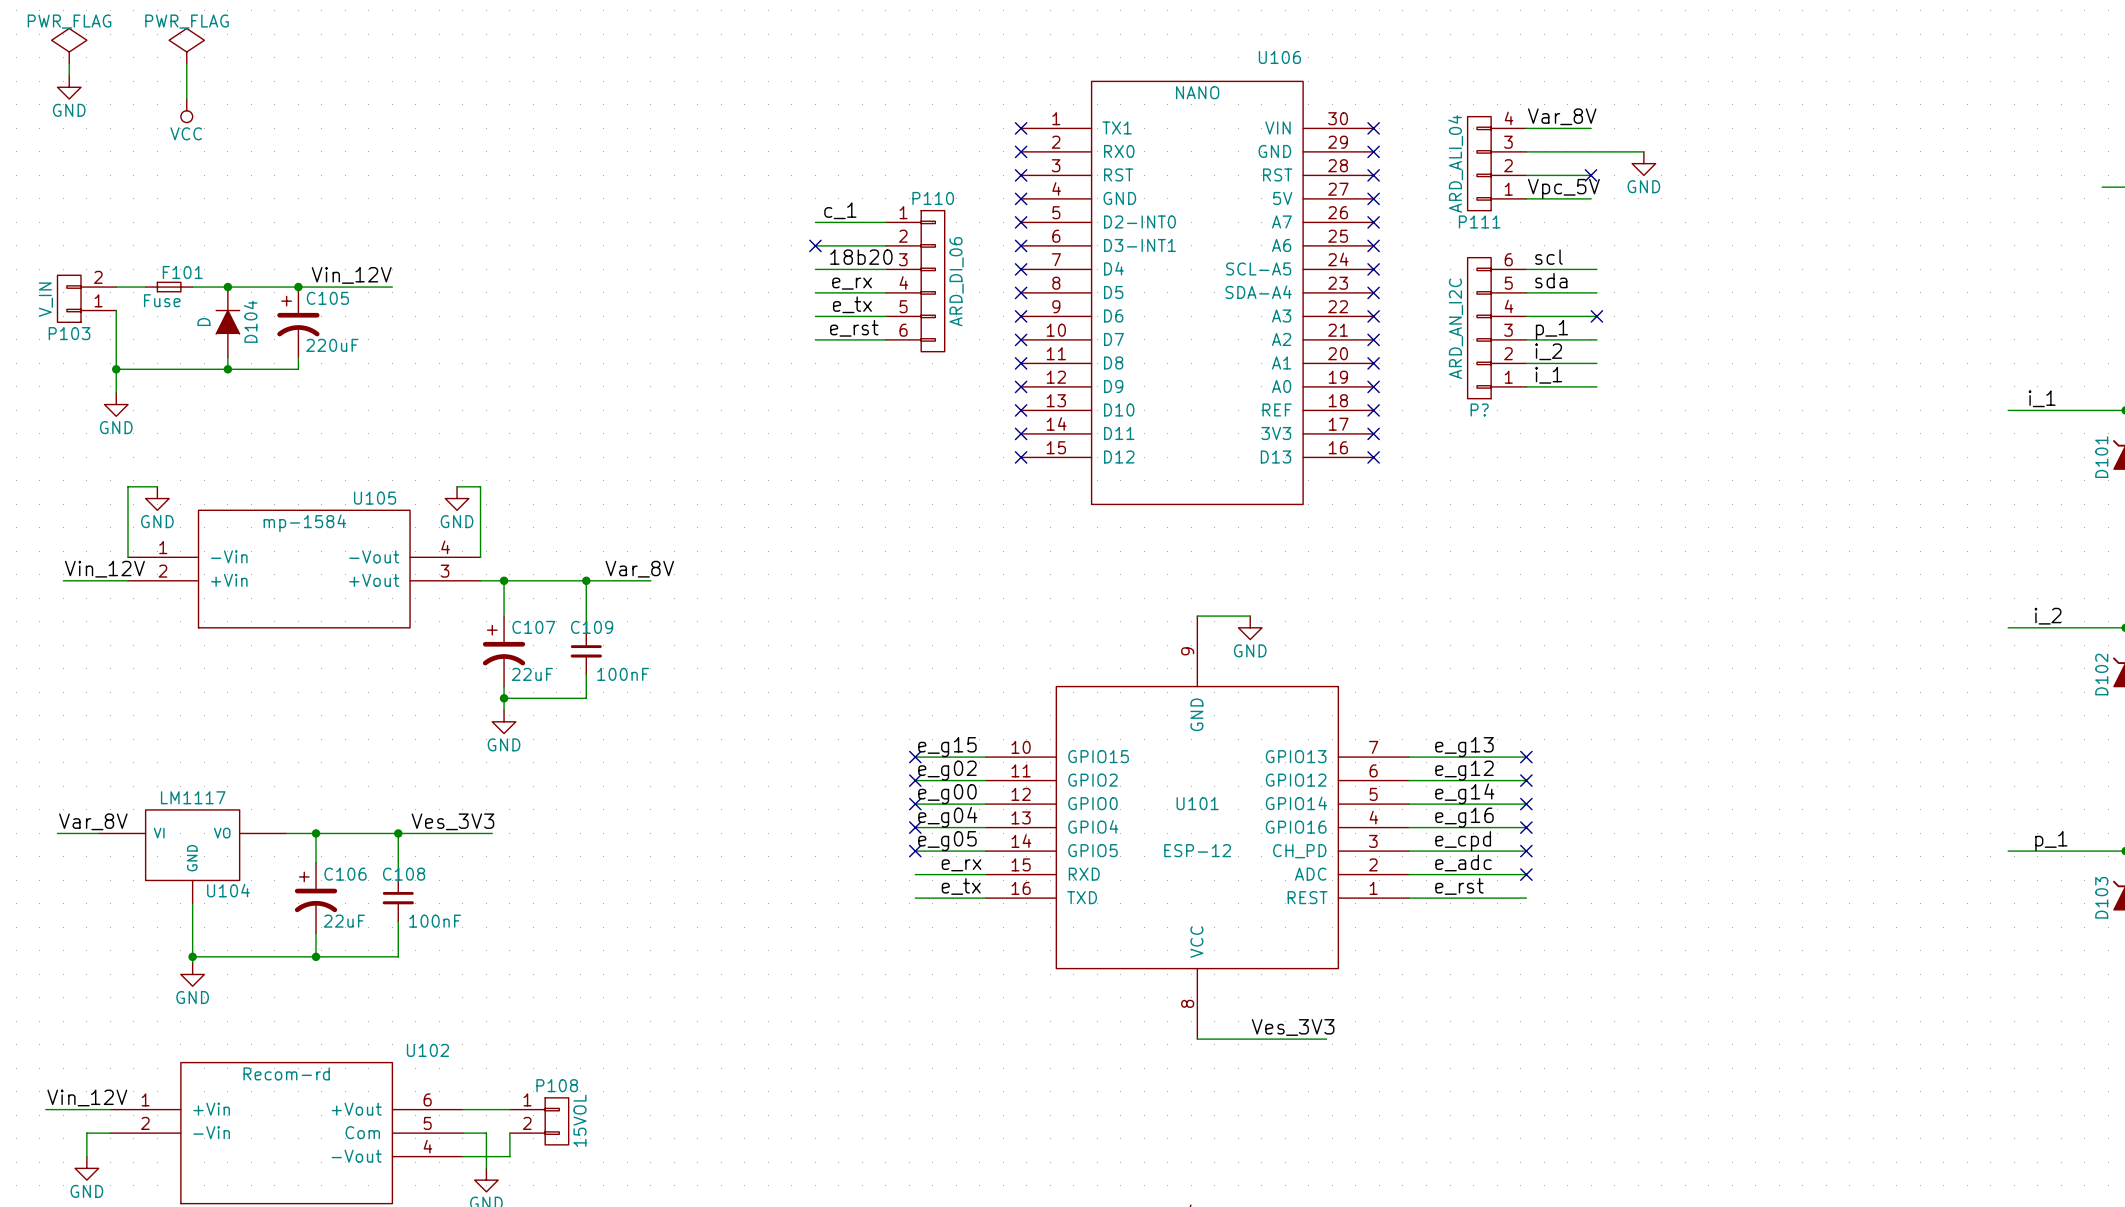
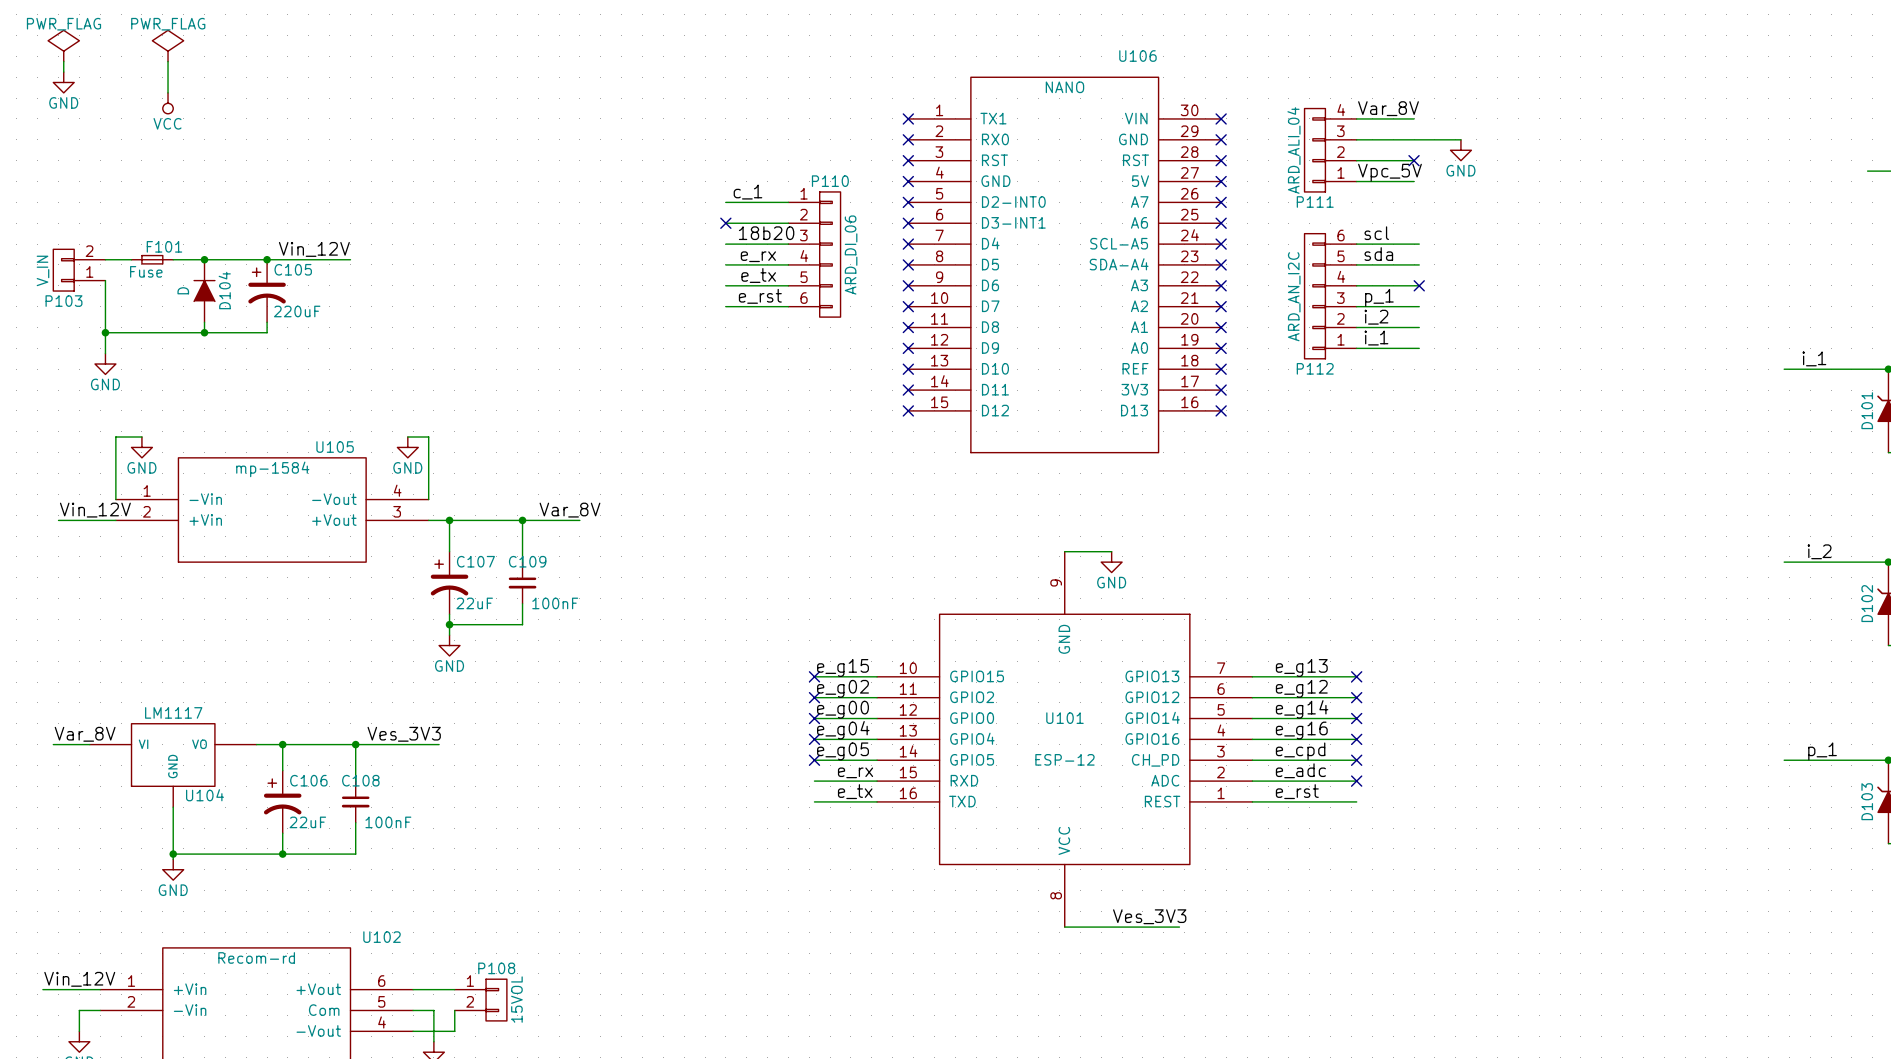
P? name: P? (1479, 409) -> P112 (1315, 368)

